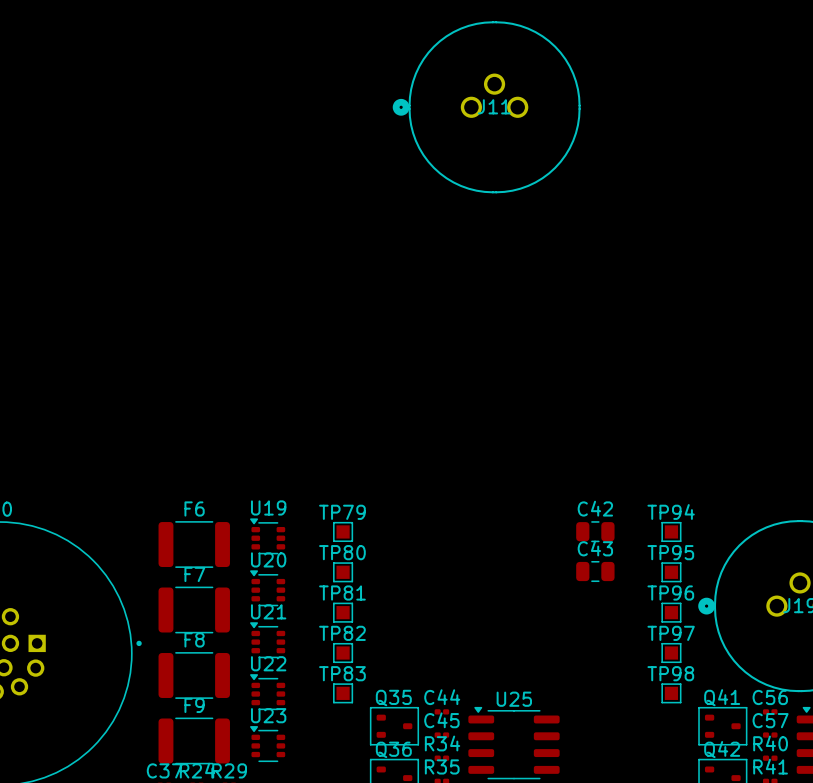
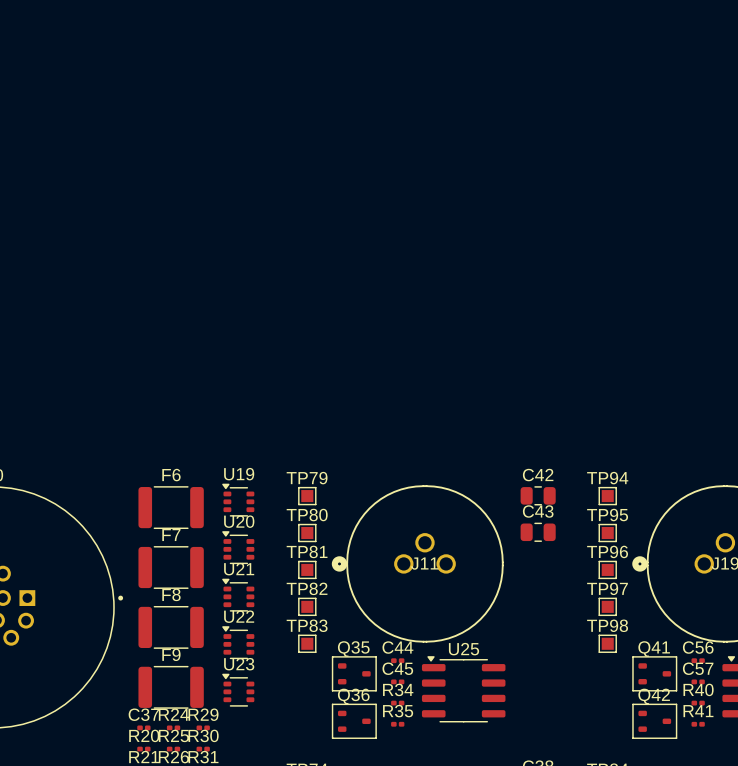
J11 position: (486, 107) -> (417, 563)

